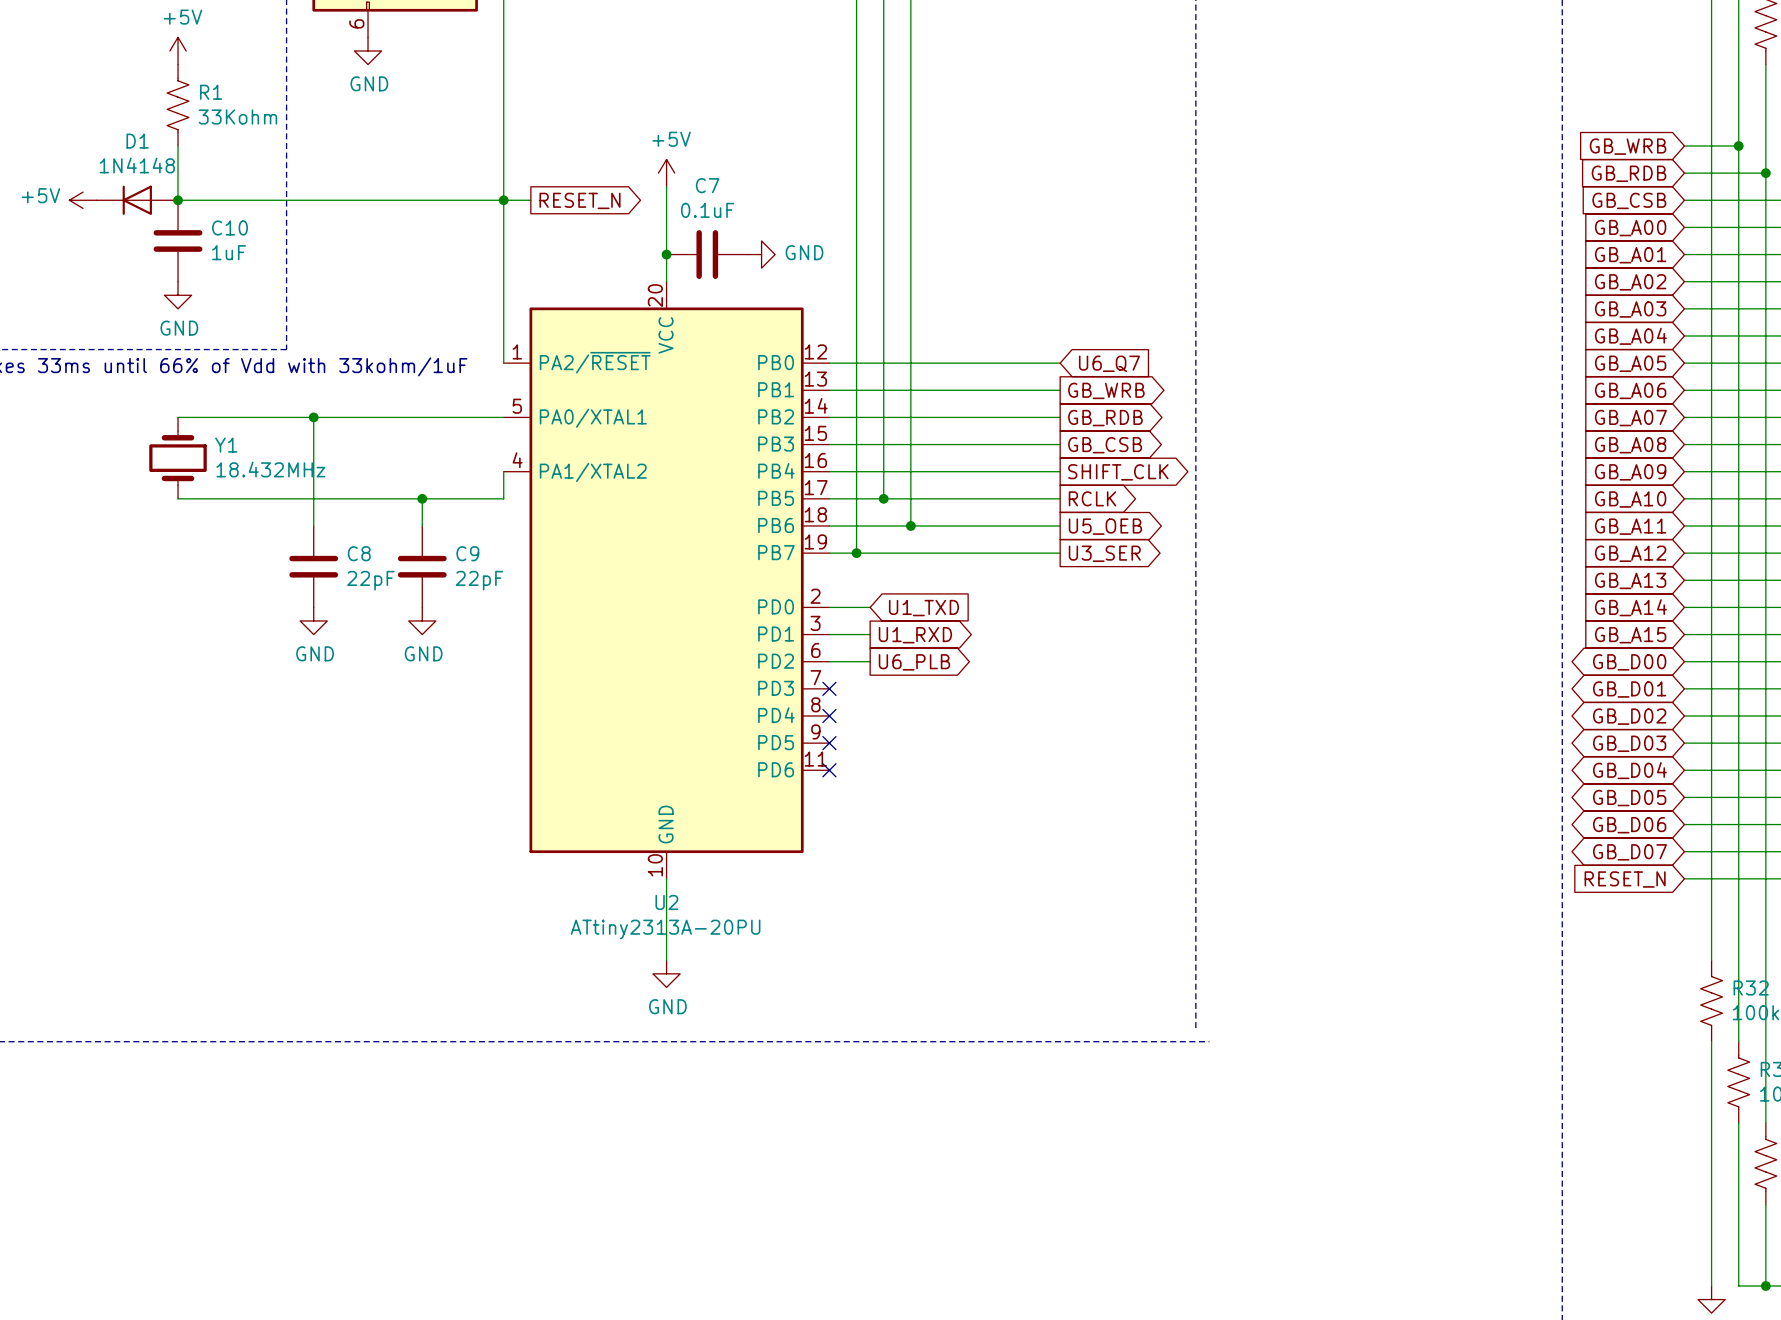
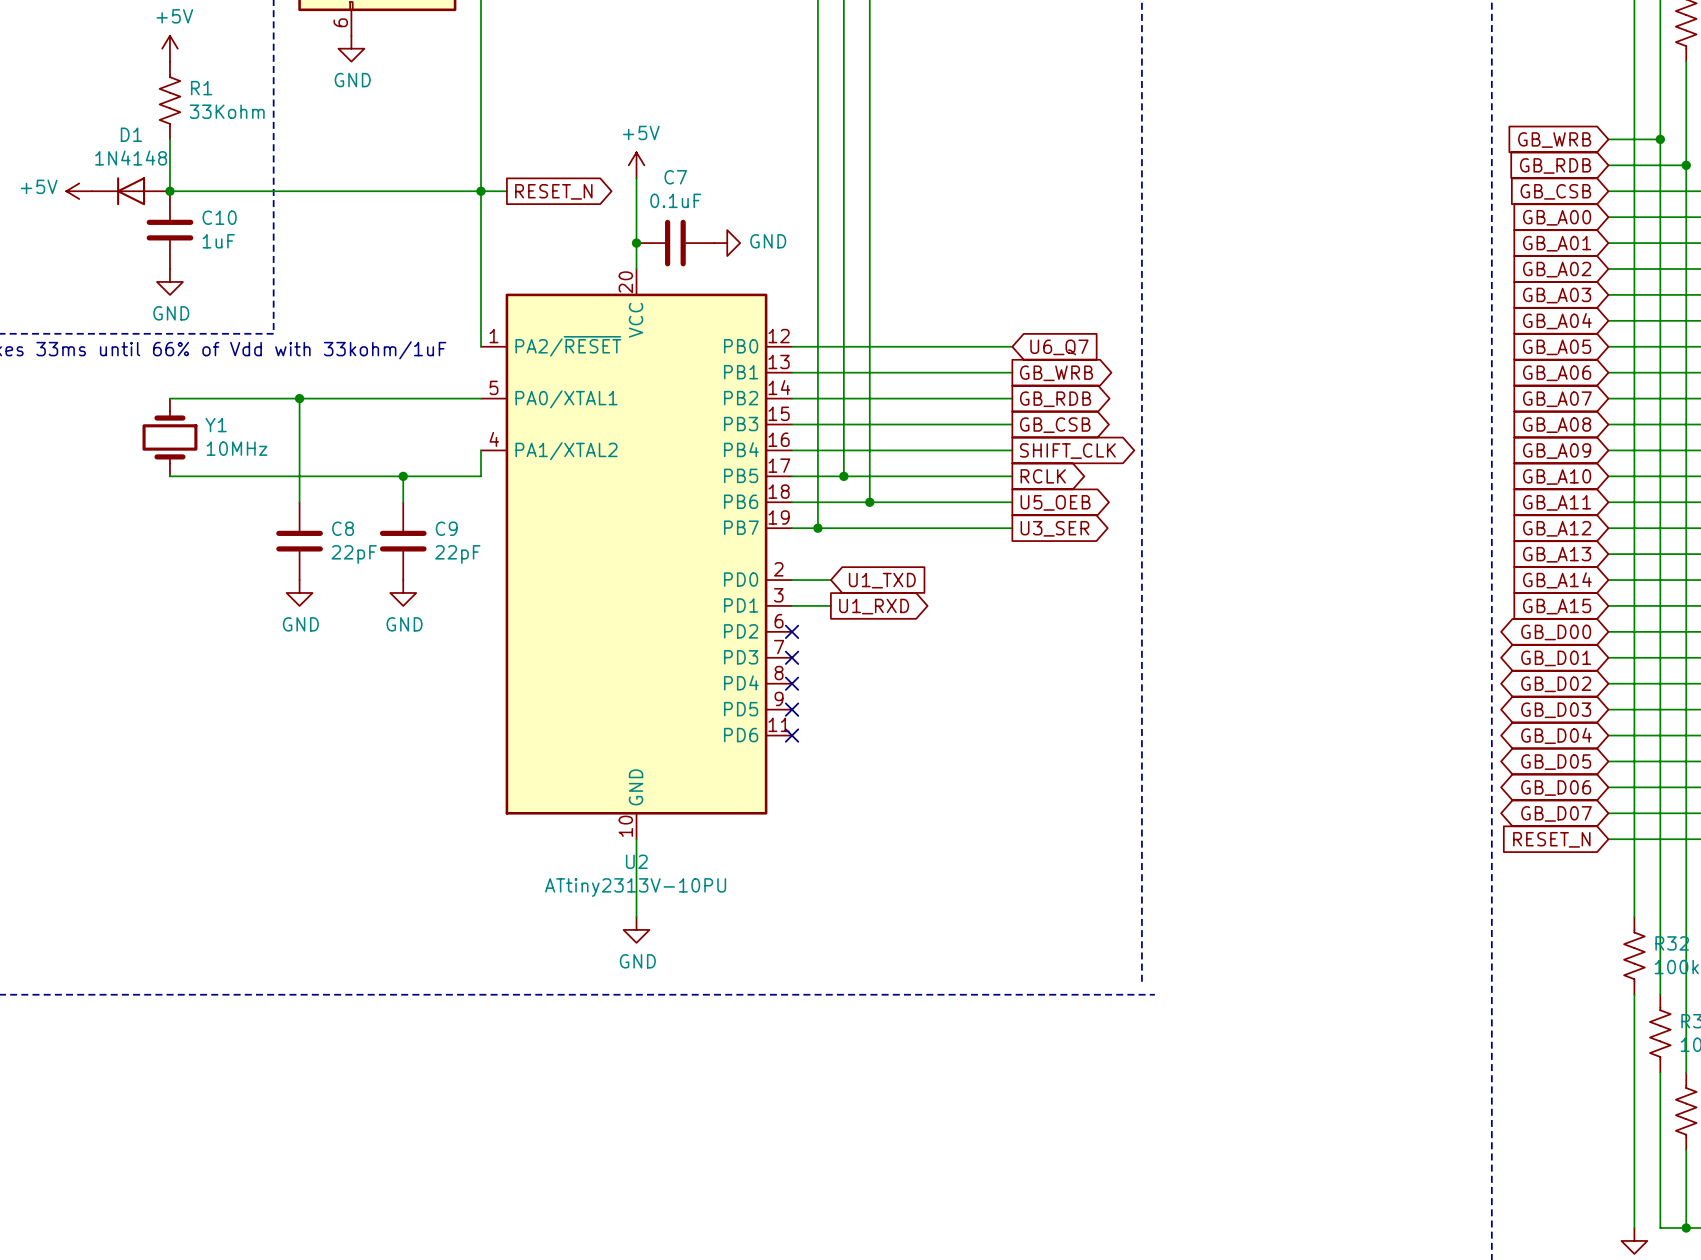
Y1 value: 18.432MHz (270, 469) -> 10MHz (237, 448)
wire: (829, 661) (870, 661) -> none
no-connect mark: none -> (792, 631)
global label: U6_PLB (914, 662) -> none
U2 value: ATtiny2313A-20PU (665, 929) -> ATtiny2313V-10PU (635, 887)

